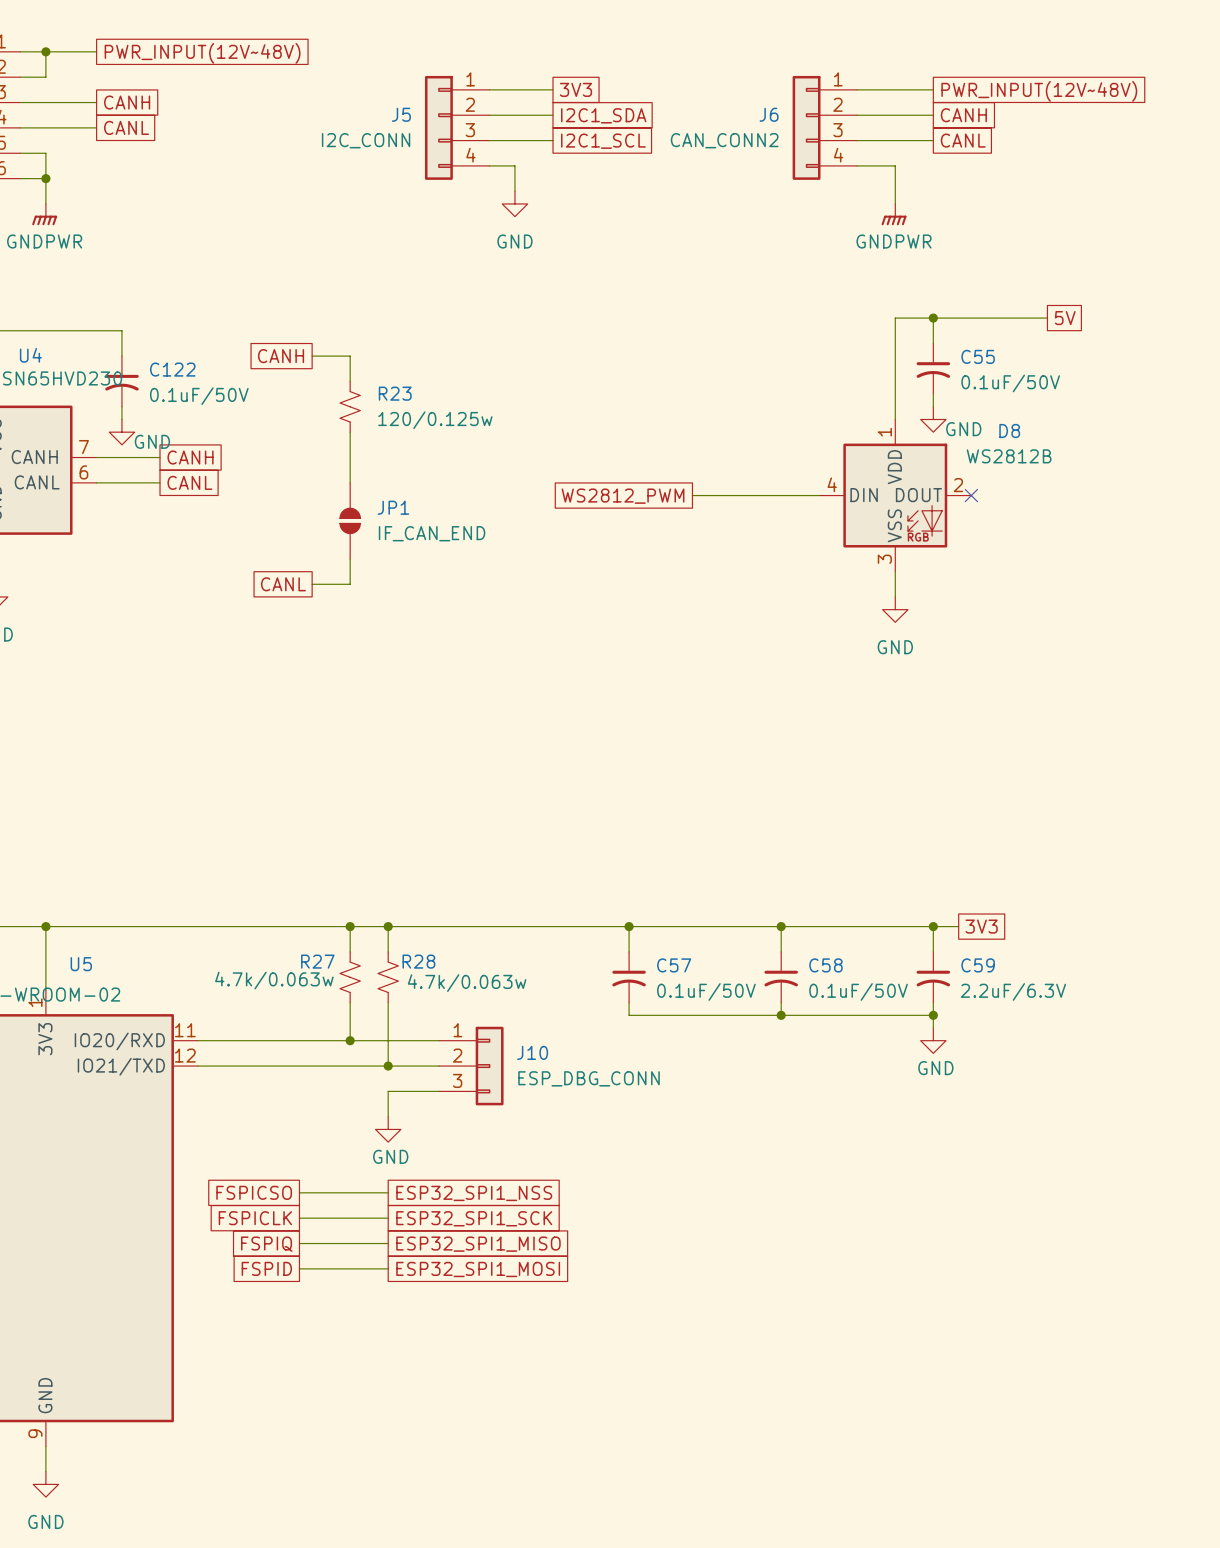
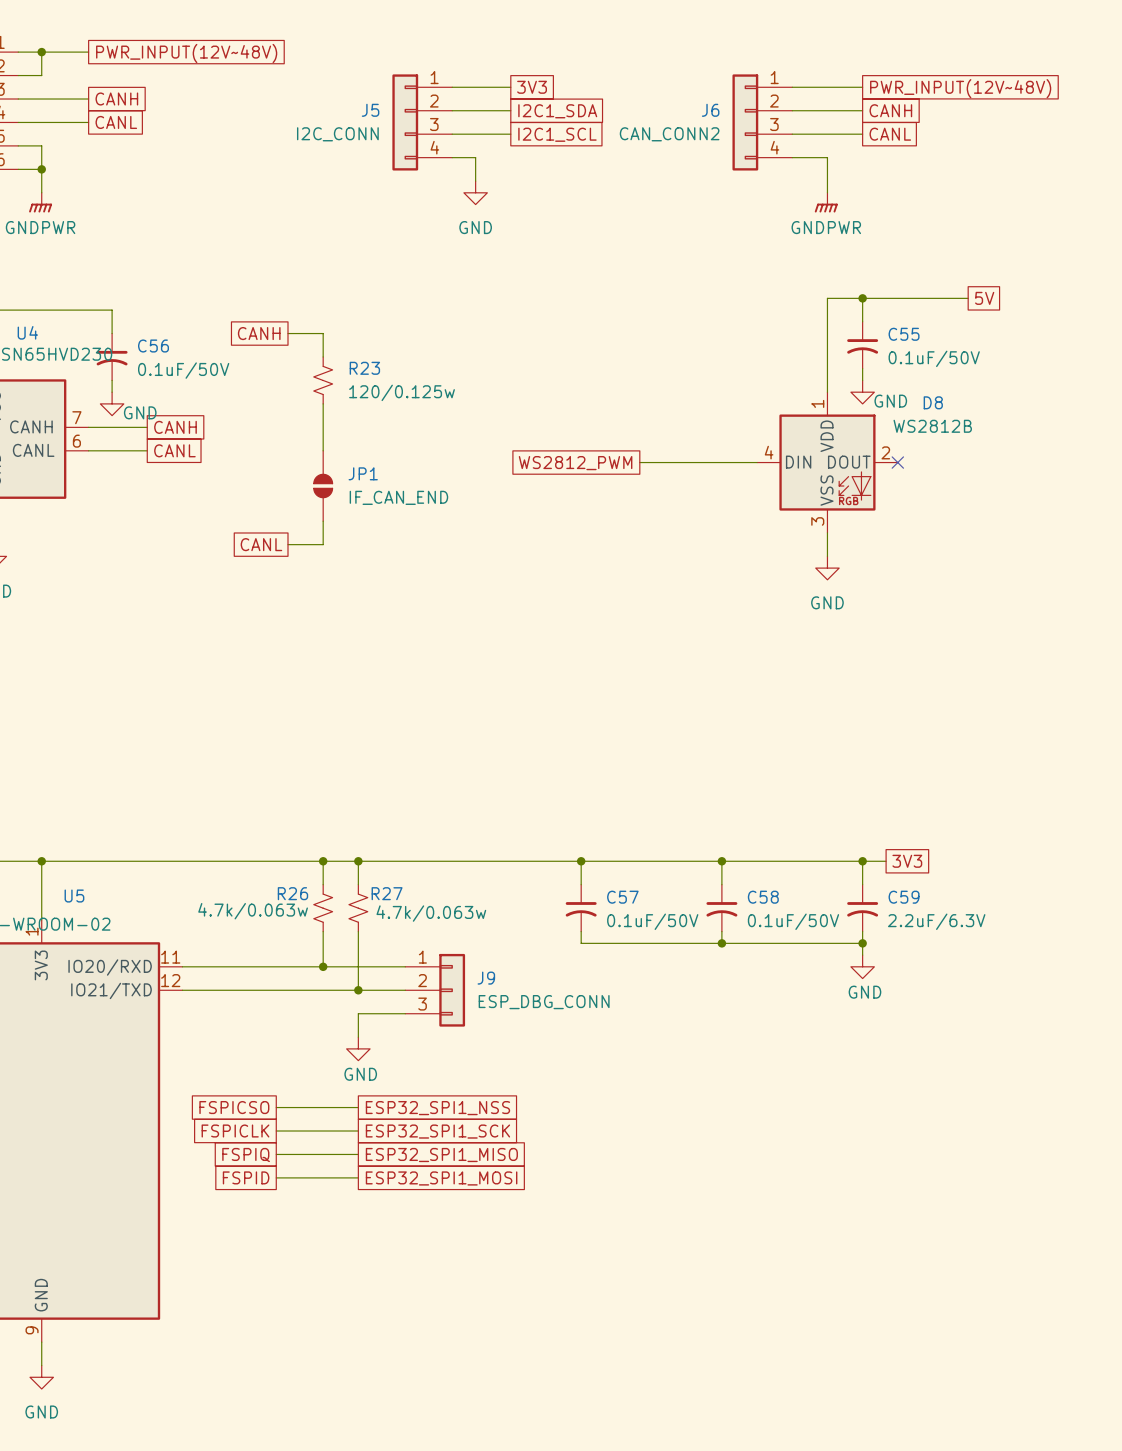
C122 name: C122 (172, 369) -> C56 (153, 346)
R27 name: R27 (317, 961) -> R26 (292, 893)
R28 name: R28 (418, 961) -> R27 (387, 893)
J10 name: J10 (532, 1052) -> J9 (486, 978)

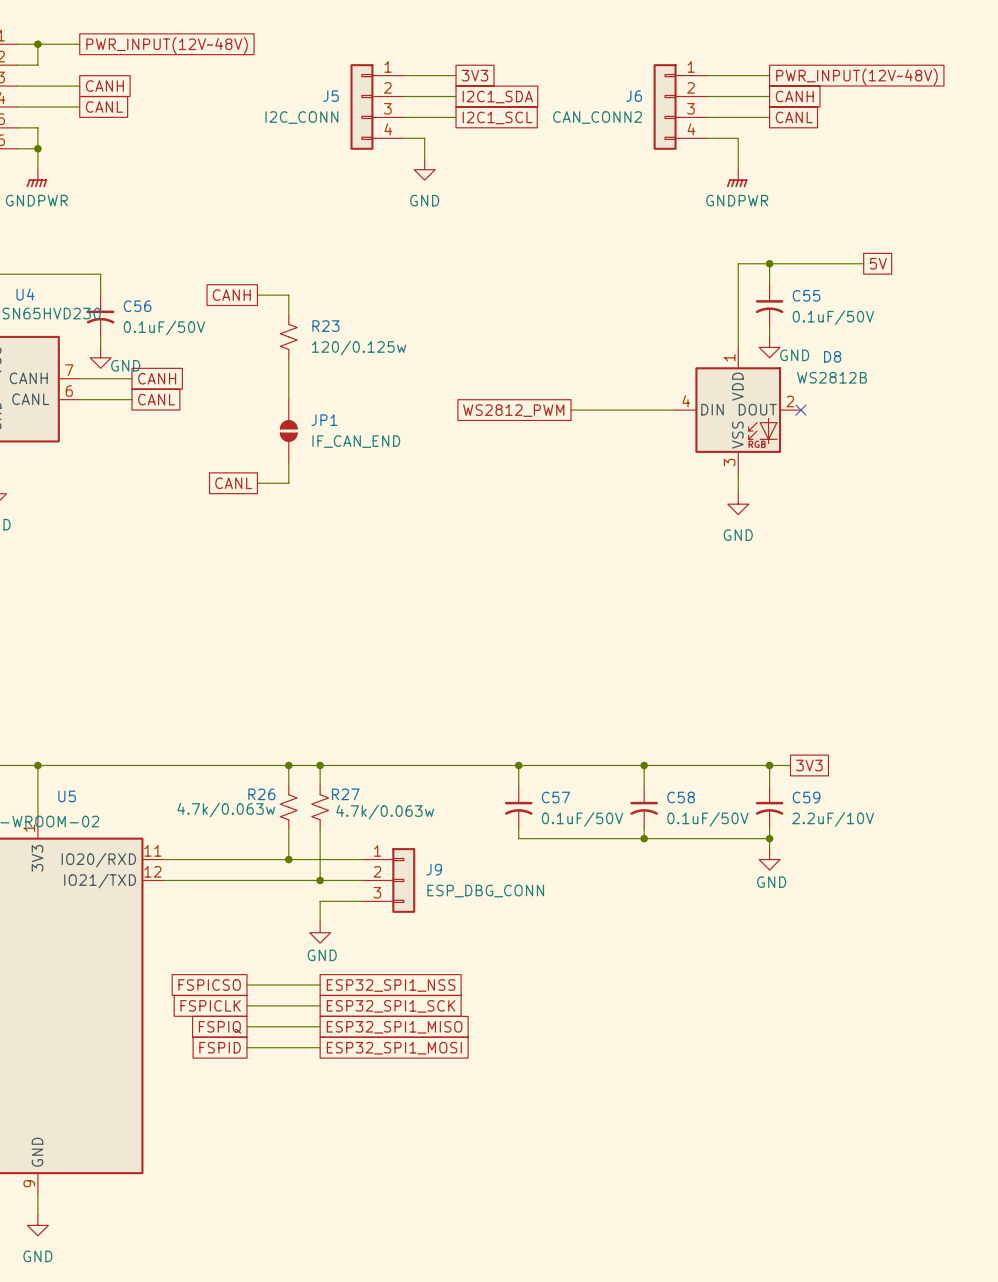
C59 value: 2.2uF/6.3V (936, 921) -> 2.2uF/10V (833, 819)

